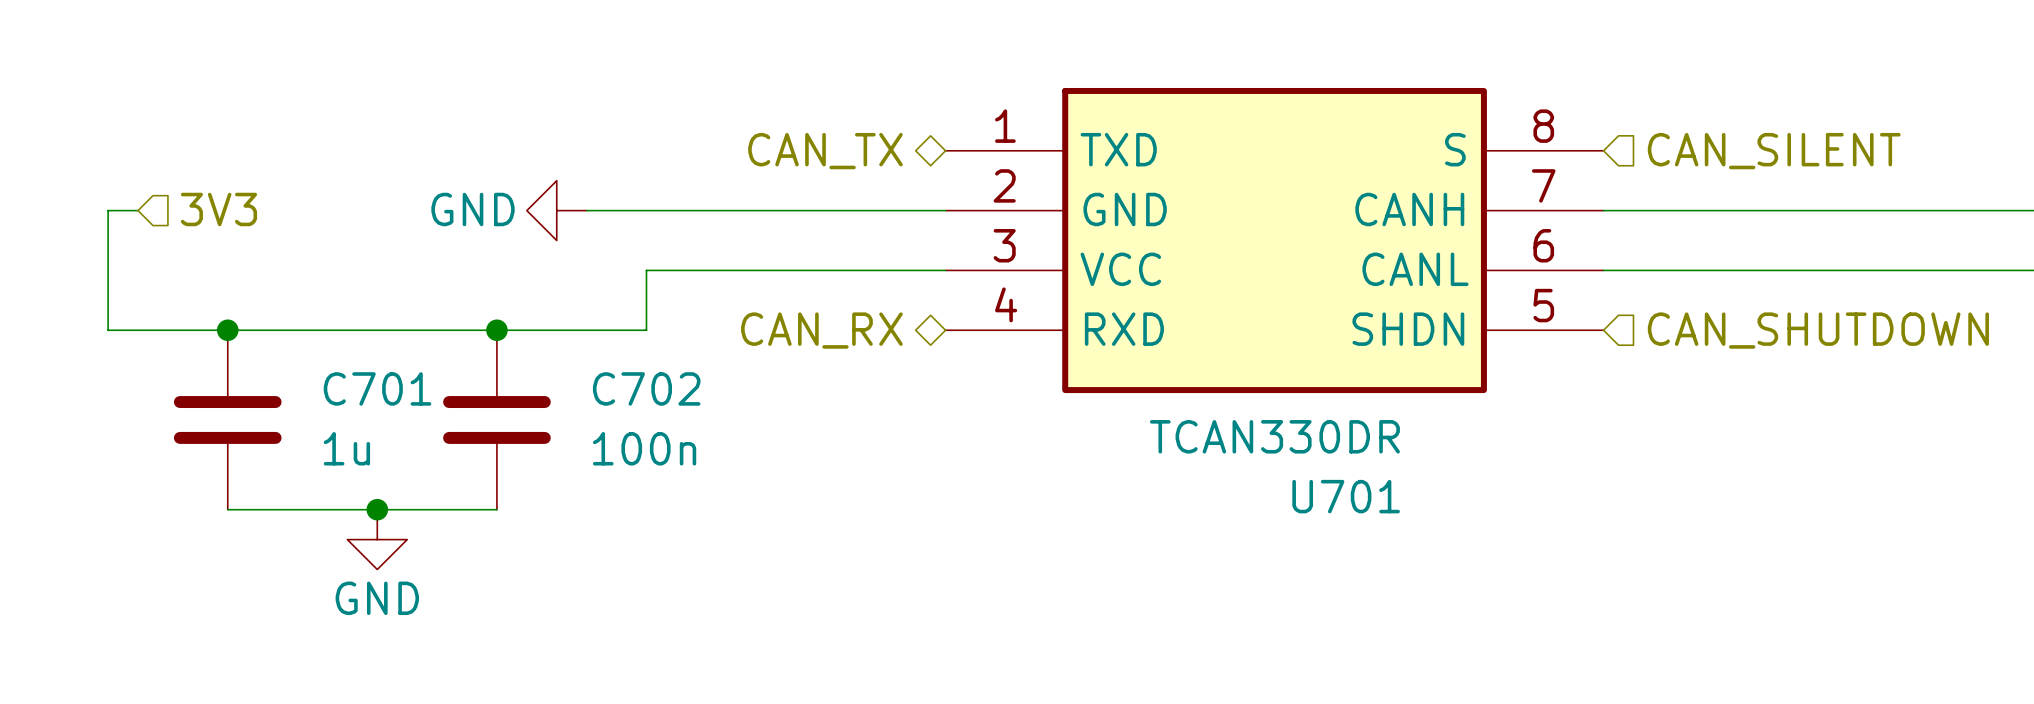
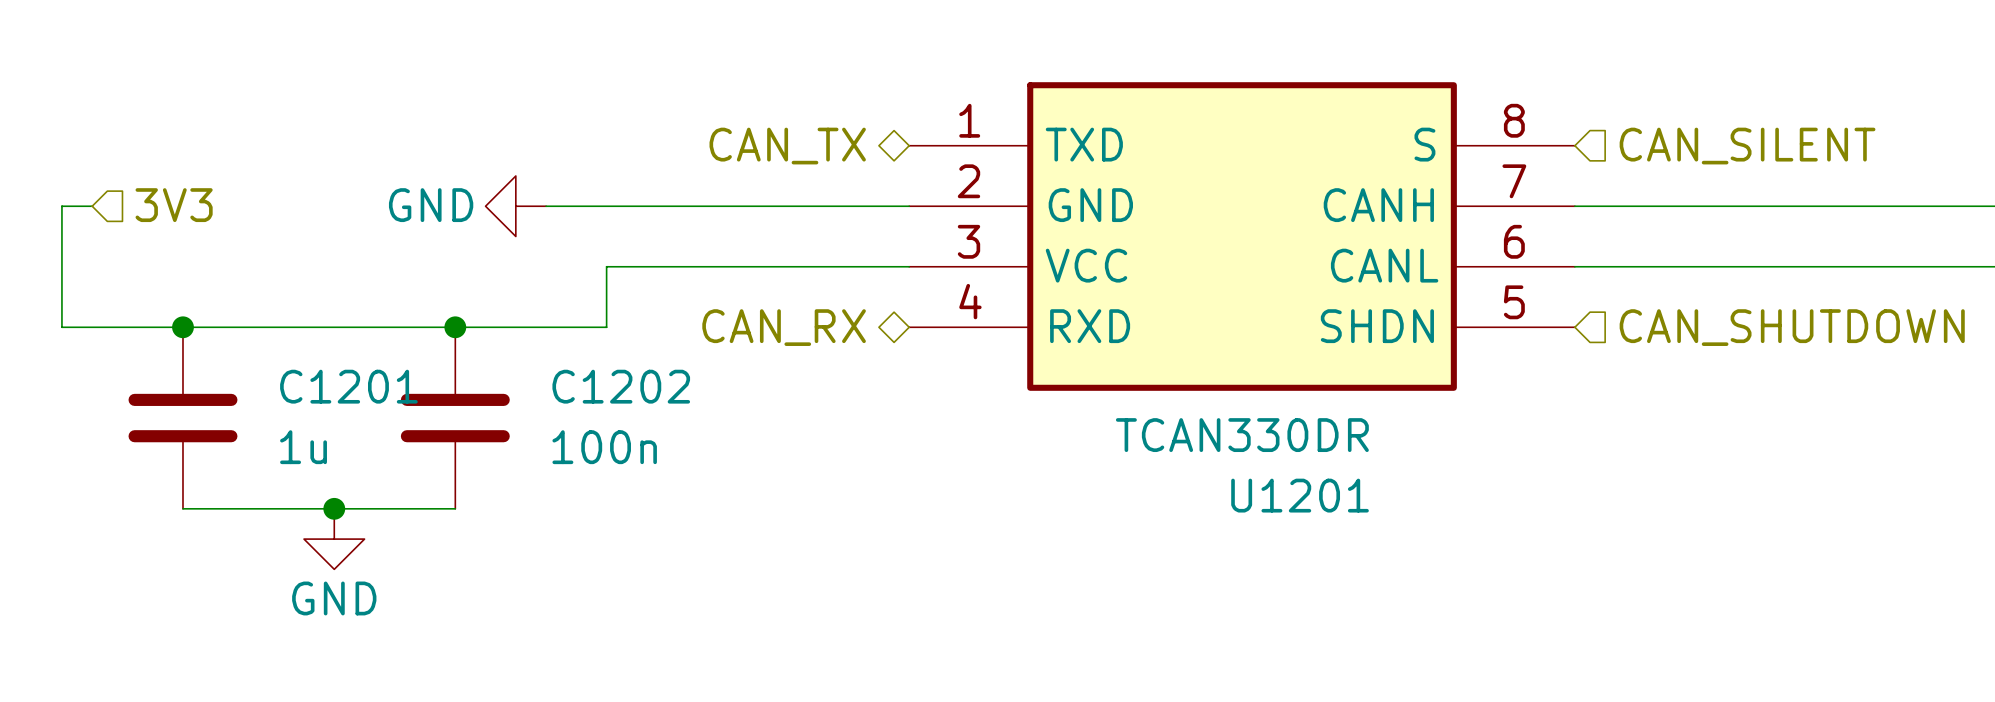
C701 name: C701 (377, 388) -> C1201 (348, 386)
C702 name: C702 (646, 388) -> C1202 (621, 386)
U701 name: U701 (1346, 496) -> U1201 (1300, 495)

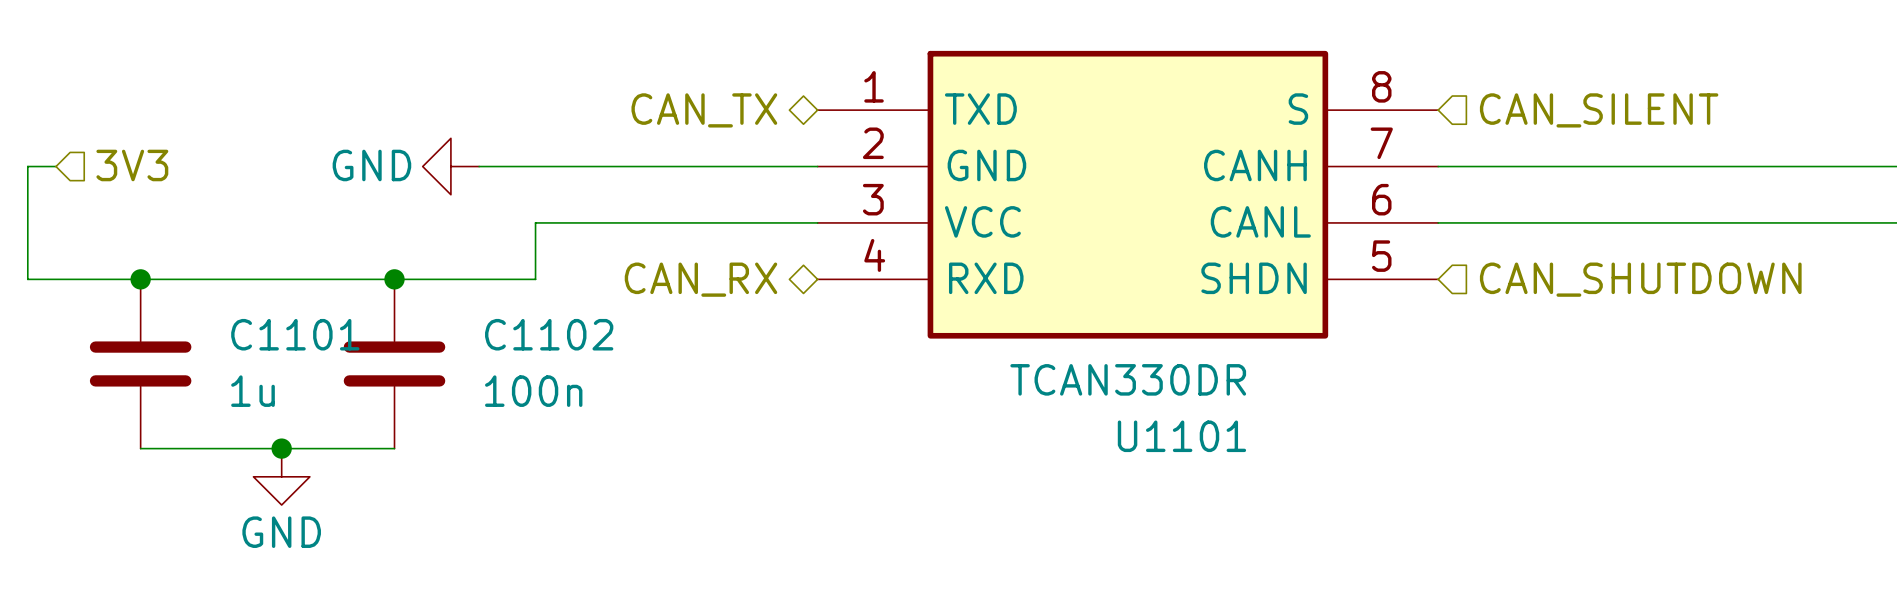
C1201 name: C1201 (348, 386) -> C1101 (295, 334)
C1202 name: C1202 (621, 386) -> C1102 (549, 334)
U1201 name: U1201 (1300, 495) -> U1101 (1181, 436)

